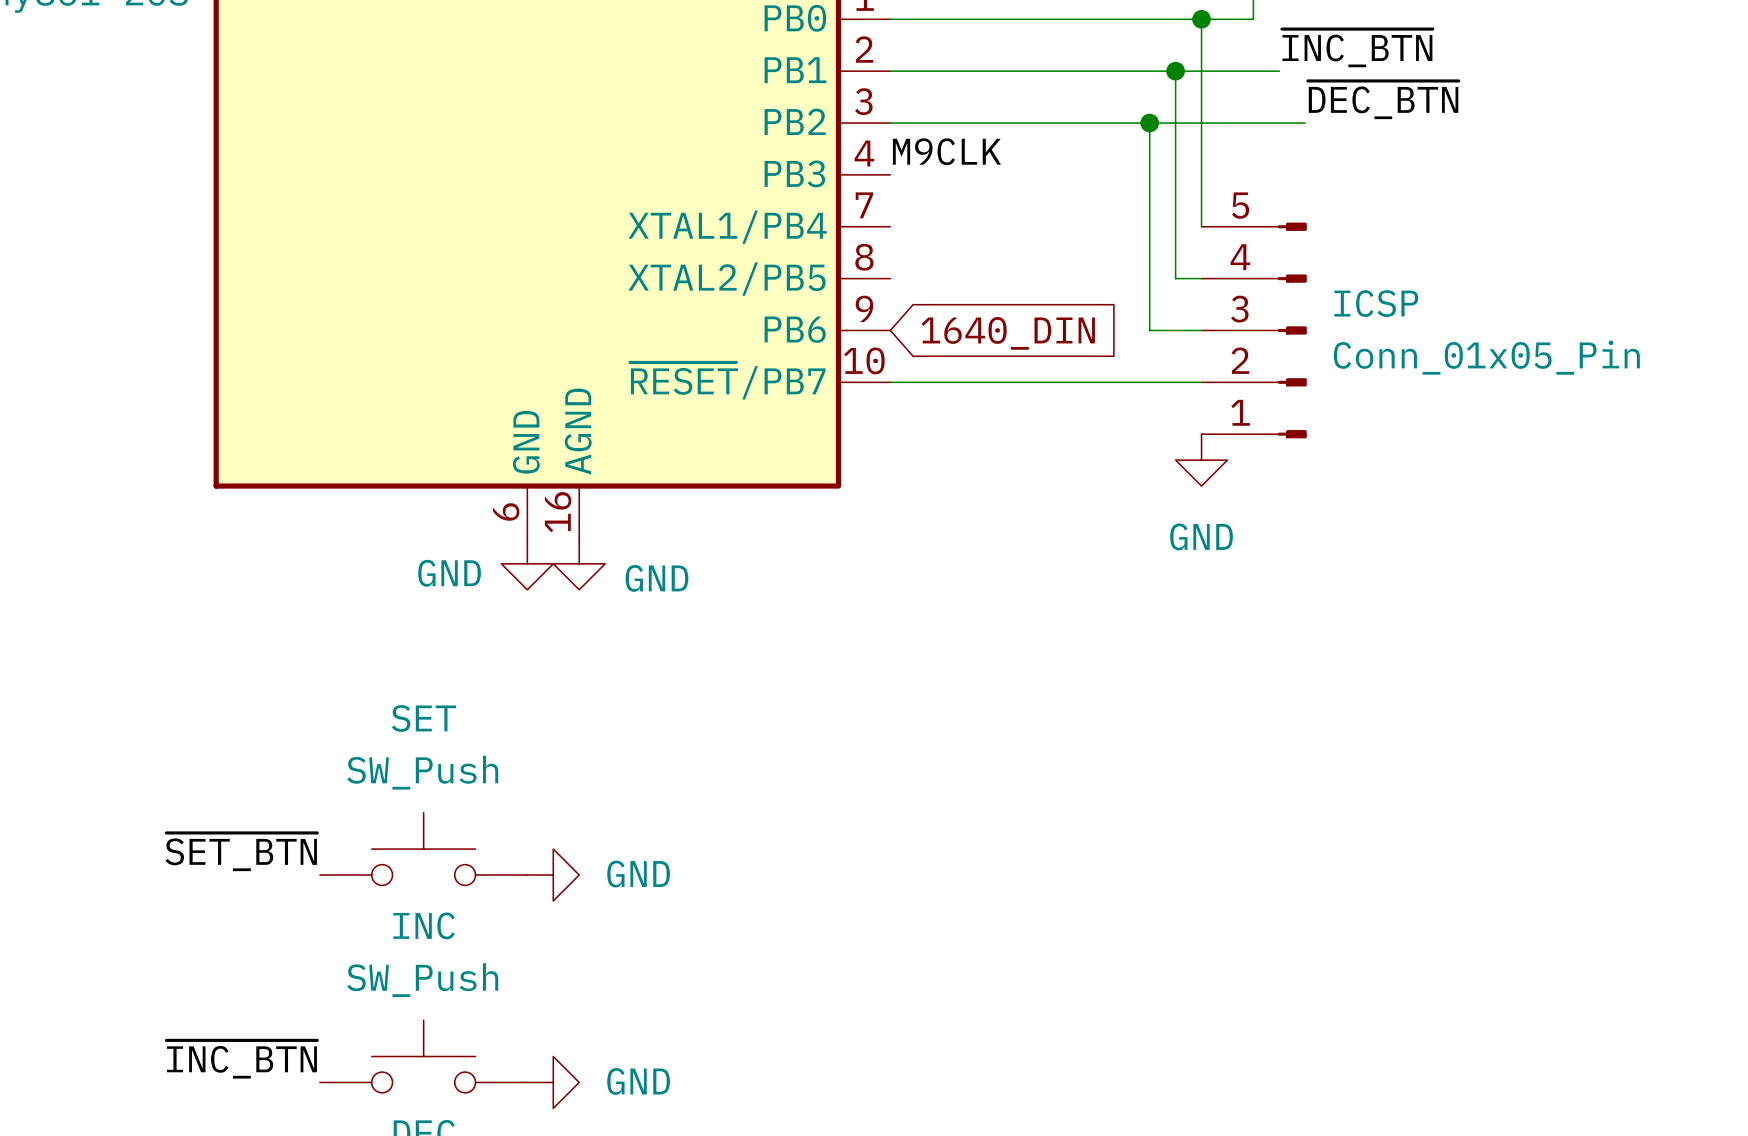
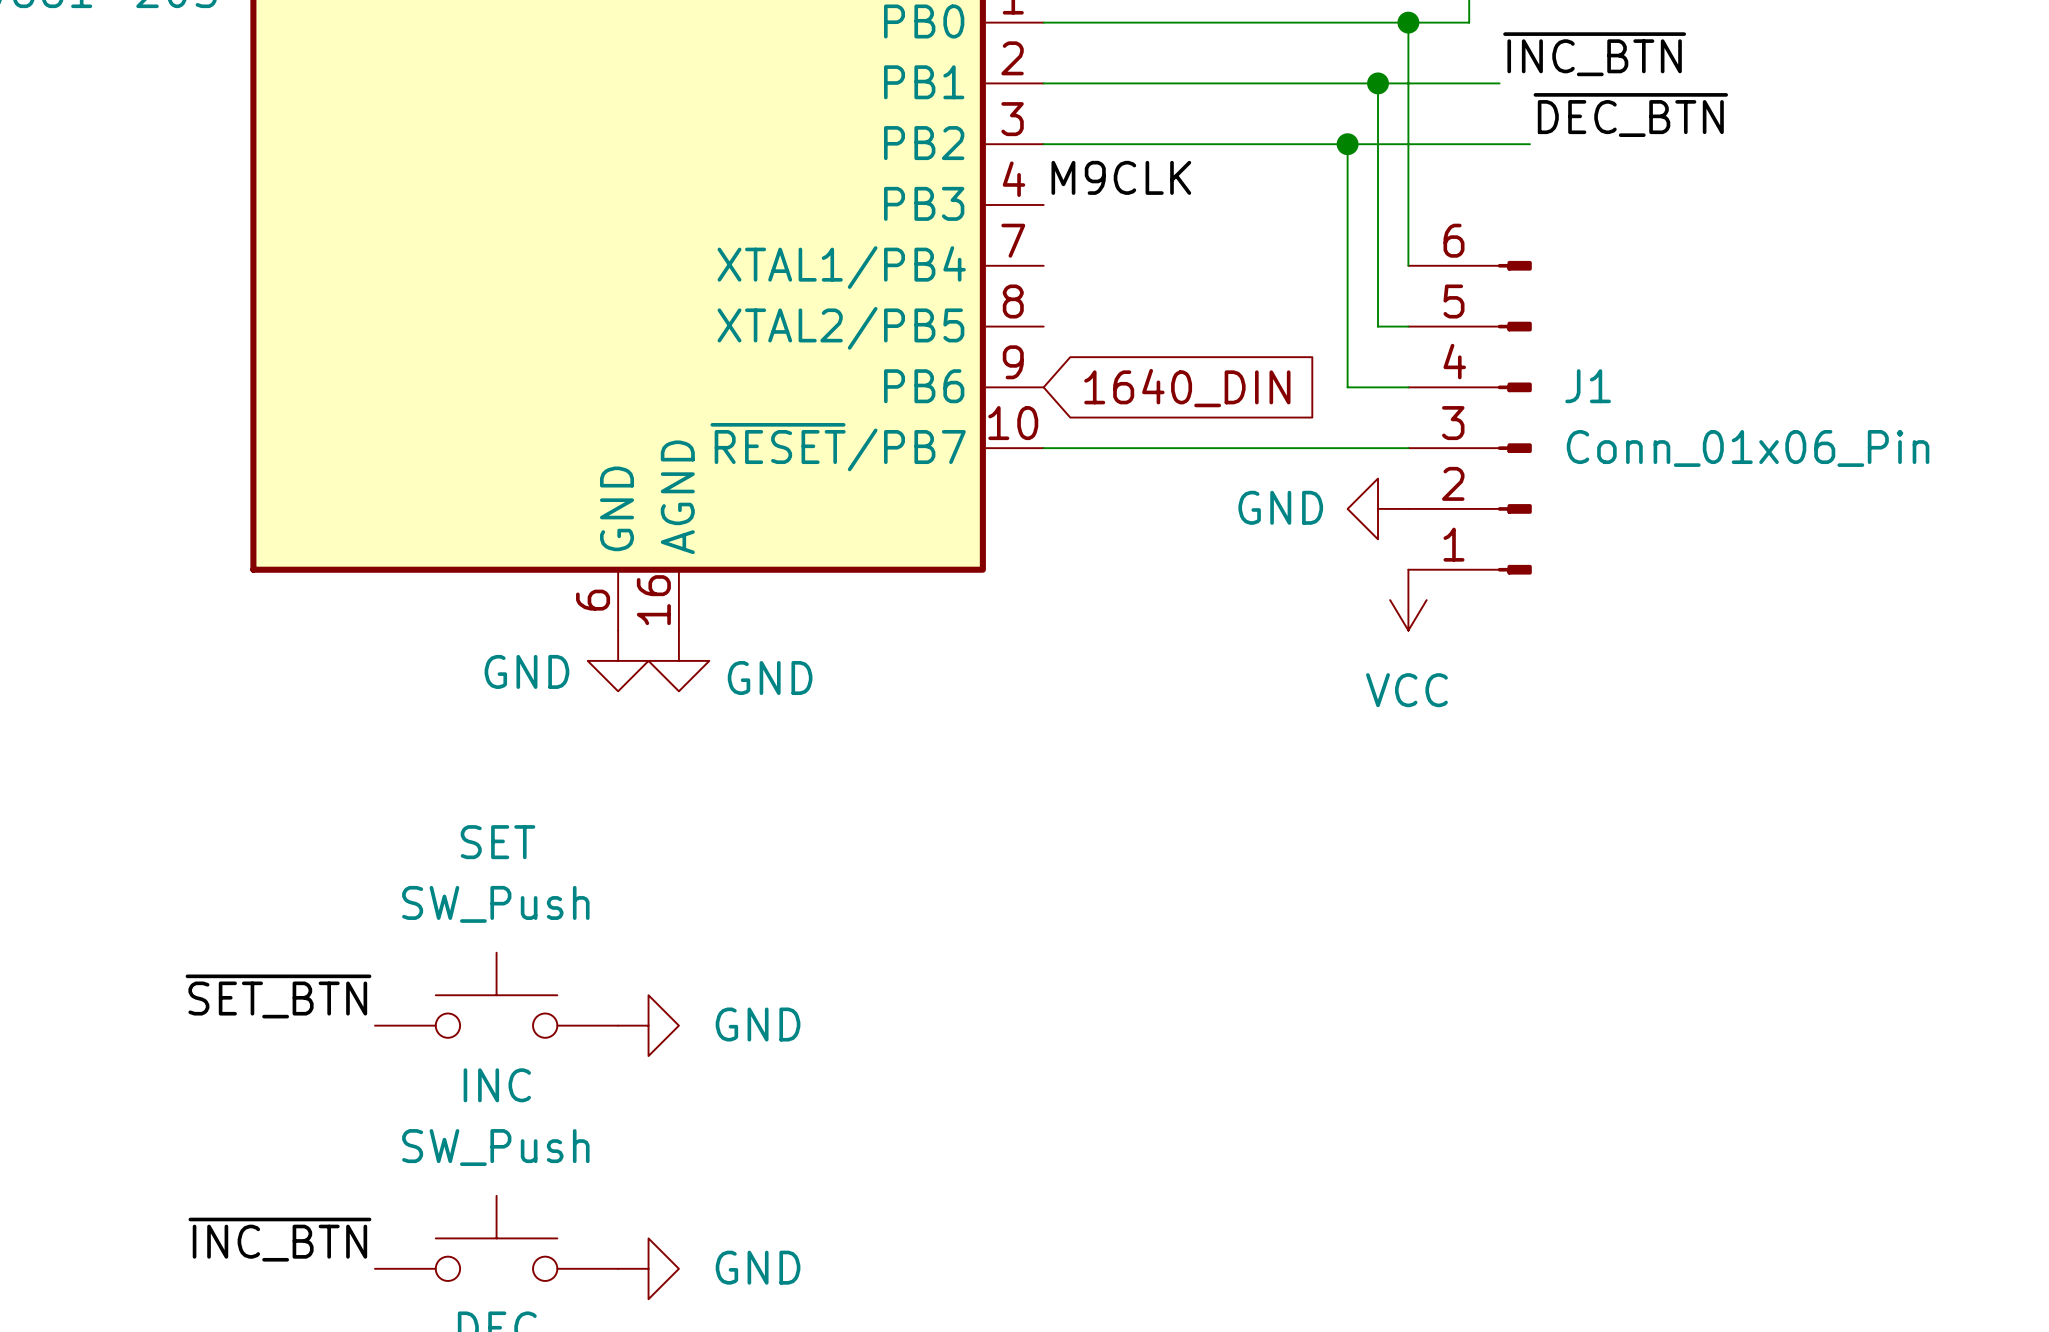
ICSP: Conn_01x05_Pin (1254, 330) -> none
J1: none -> Conn_01x06_Pin (1470, 417)
power symbol rotation: 0° (1201, 460) -> 90° clockwise (1378, 508)
power symbol position: GND (1201, 460) -> GND (1378, 508)
power symbol: none -> VCC (1408, 600)

